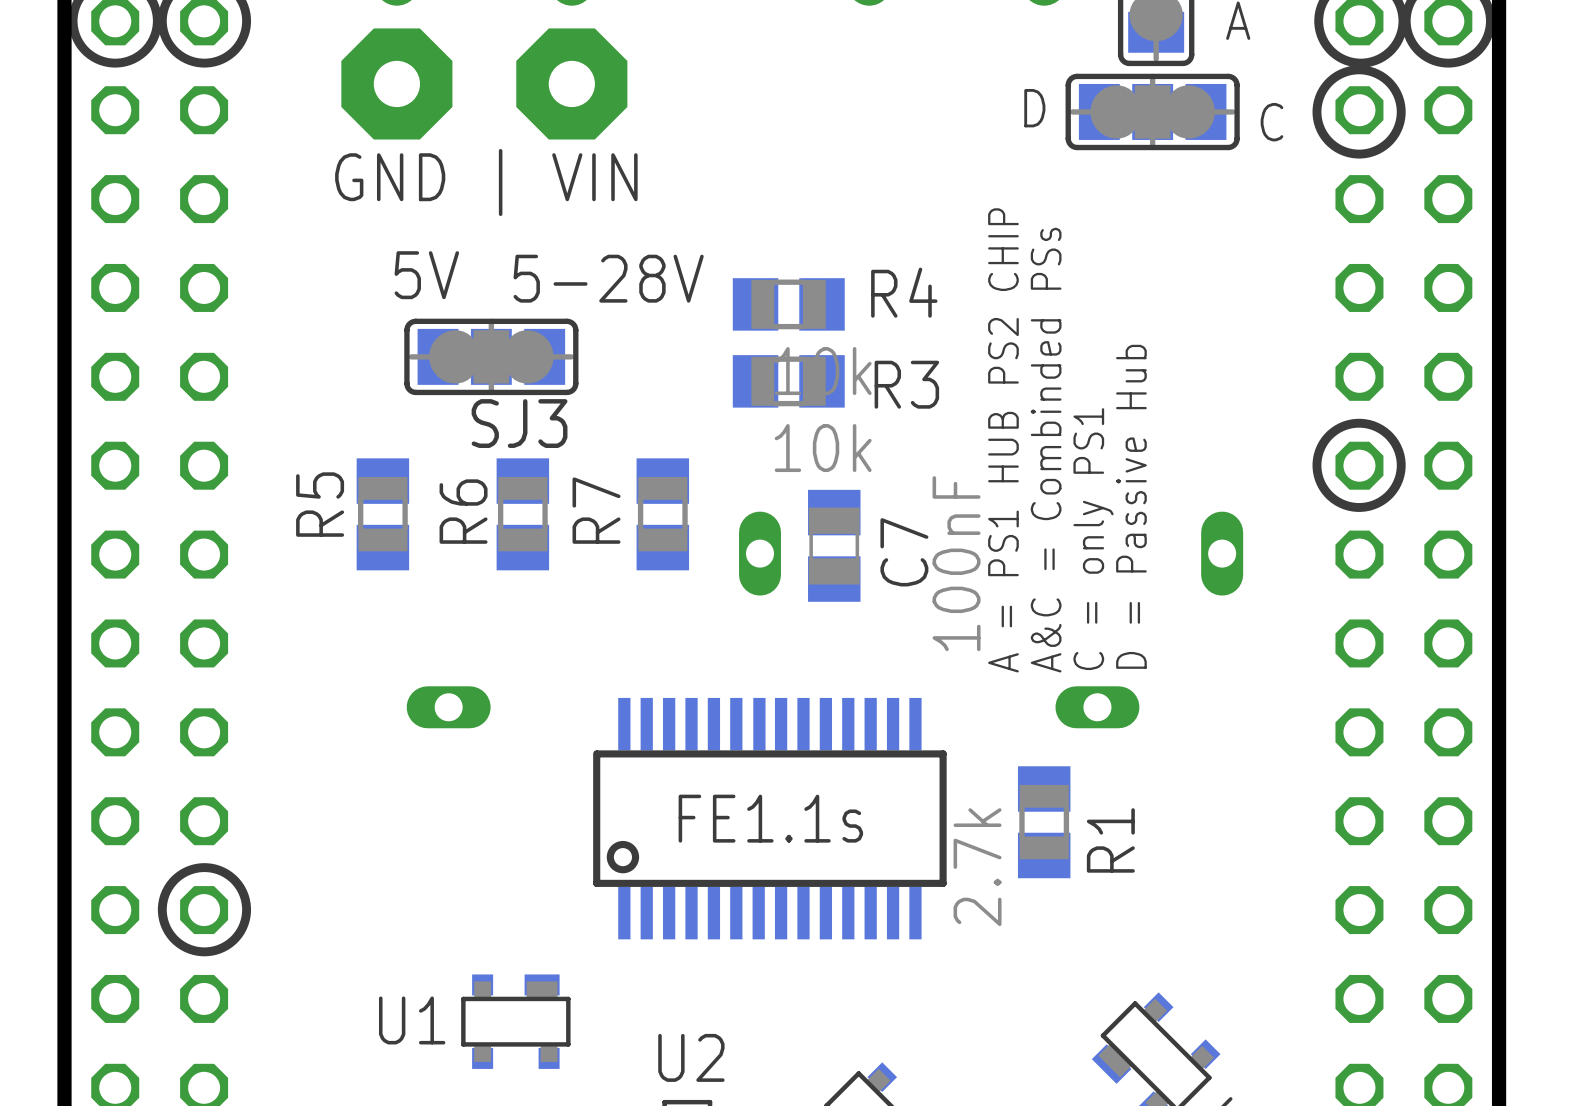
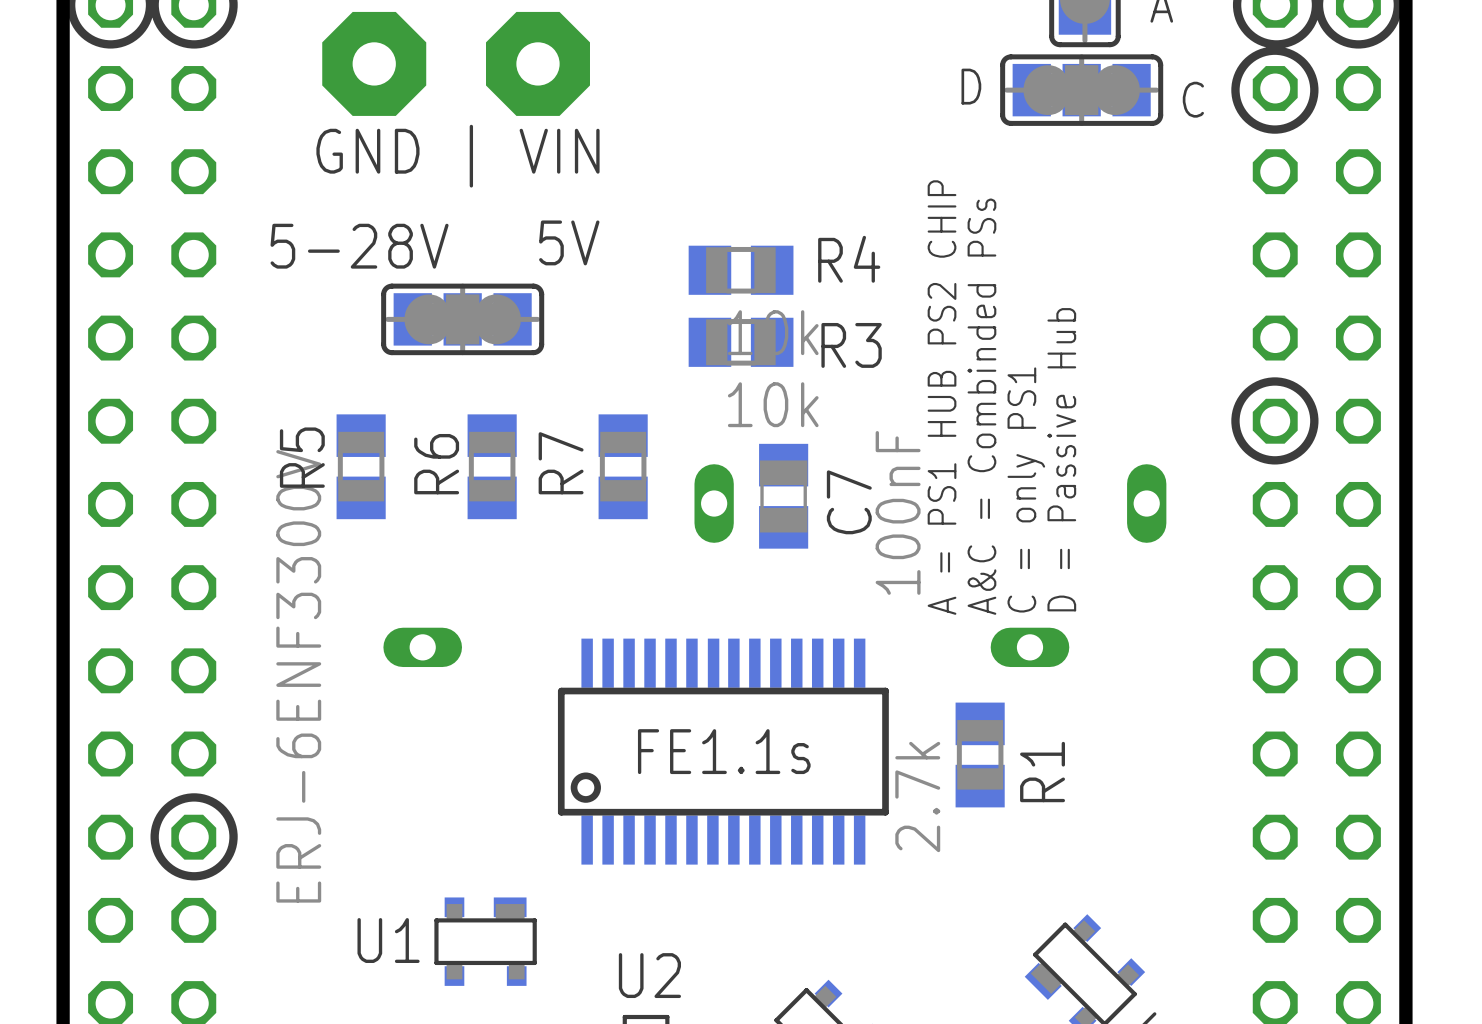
text position: 5V (426, 275) -> 5V (569, 242)
text position: 5-28V (608, 278) -> 5-28V (359, 246)
SJ3 name: SJ3 (519, 423) -> none
R5 value: none -> ERJ-6ENF3300V (298, 676)

